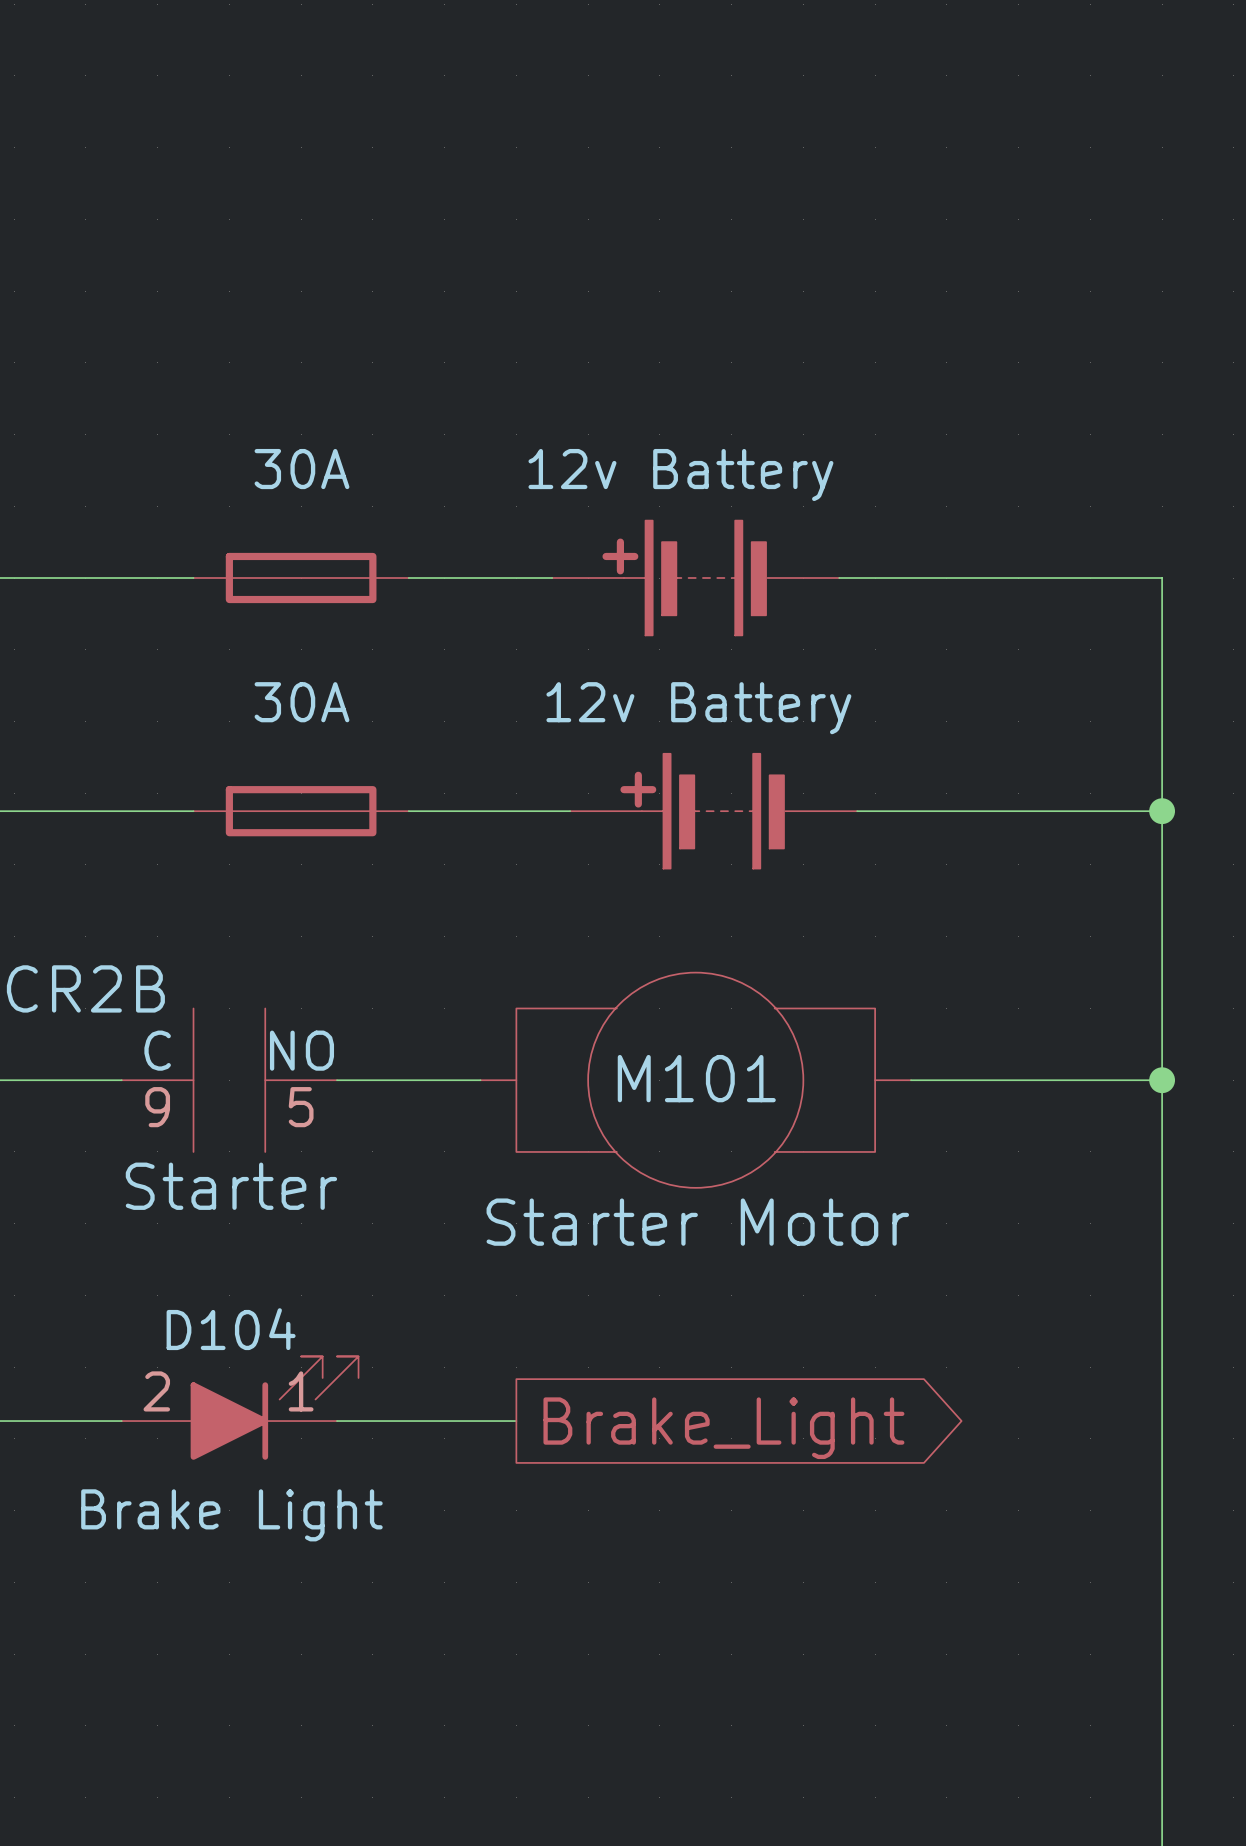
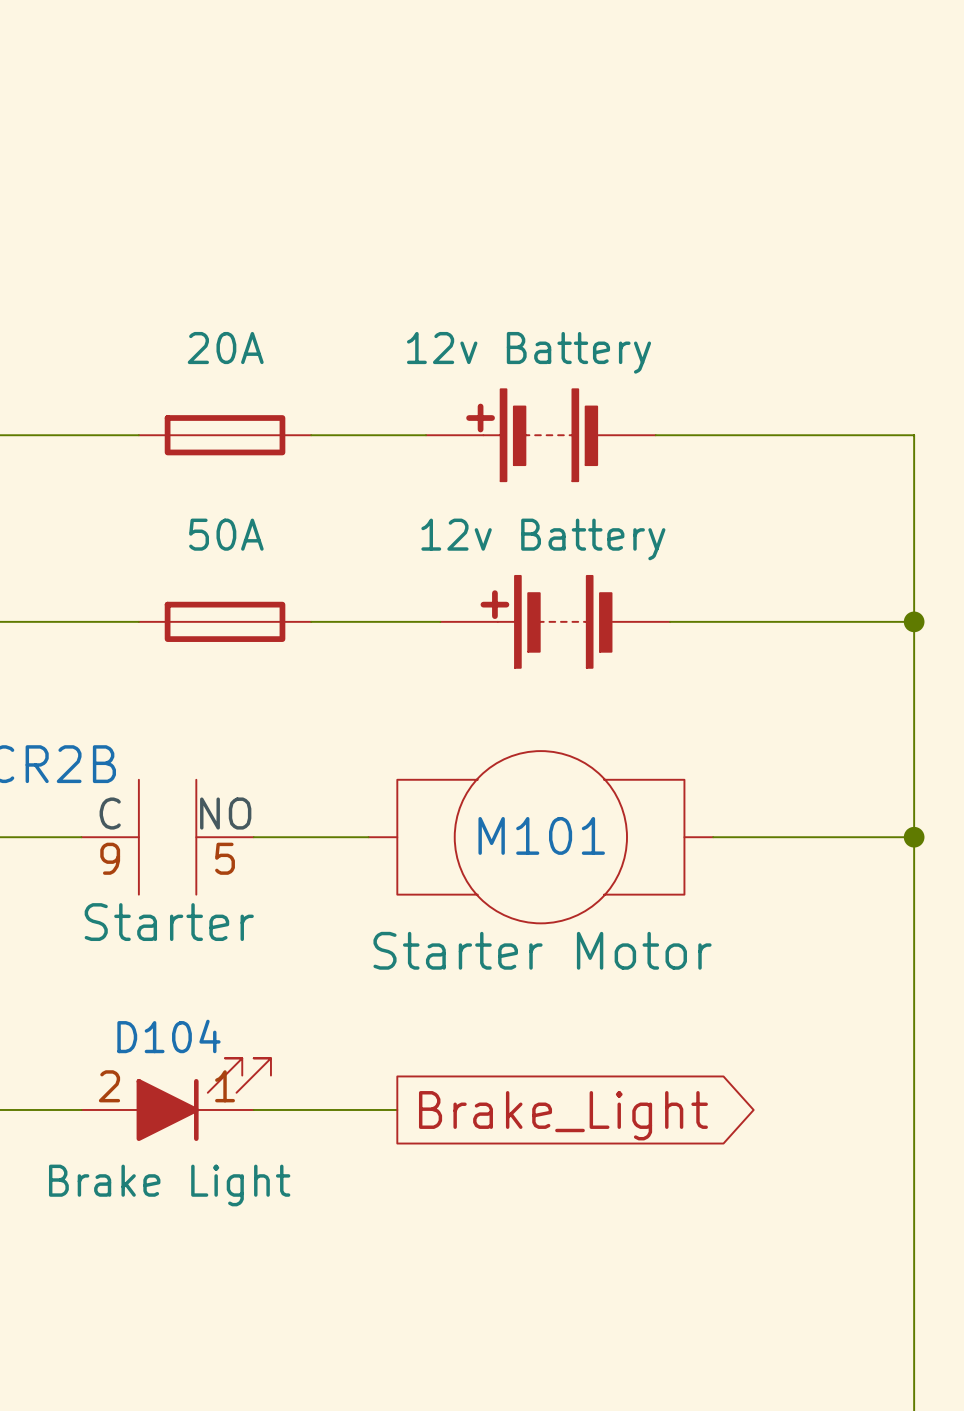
part value: 30A (301, 469) -> 20A (225, 348)
part value: 30A (301, 702) -> 50A (226, 534)

